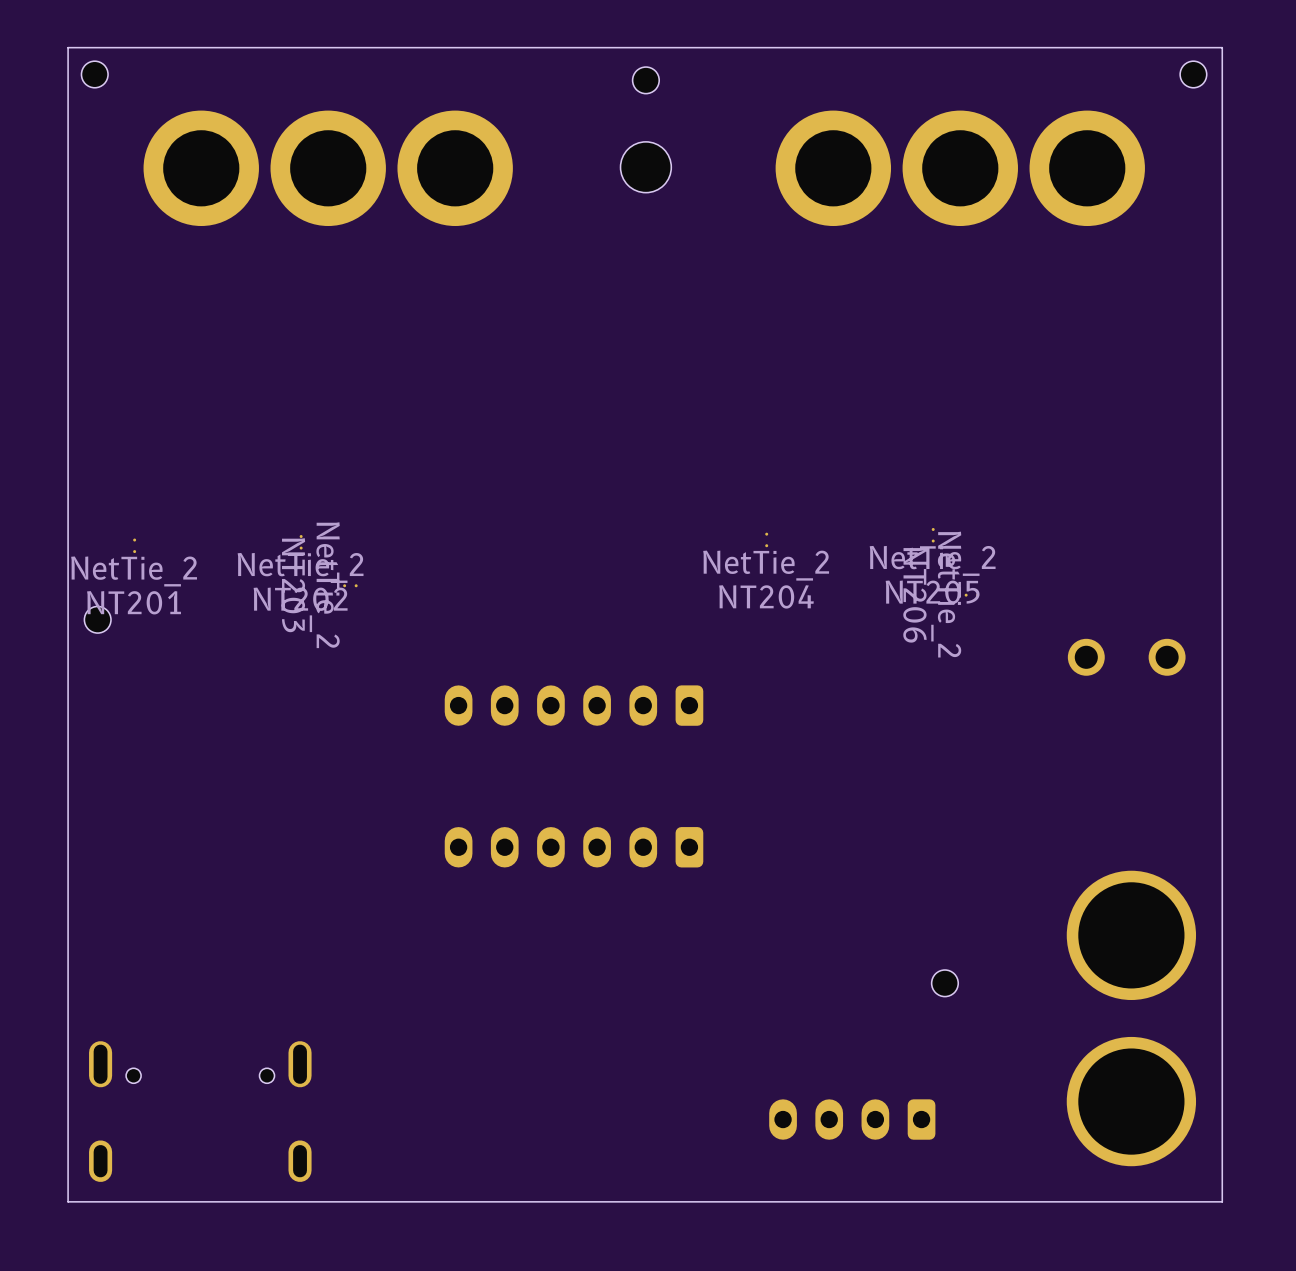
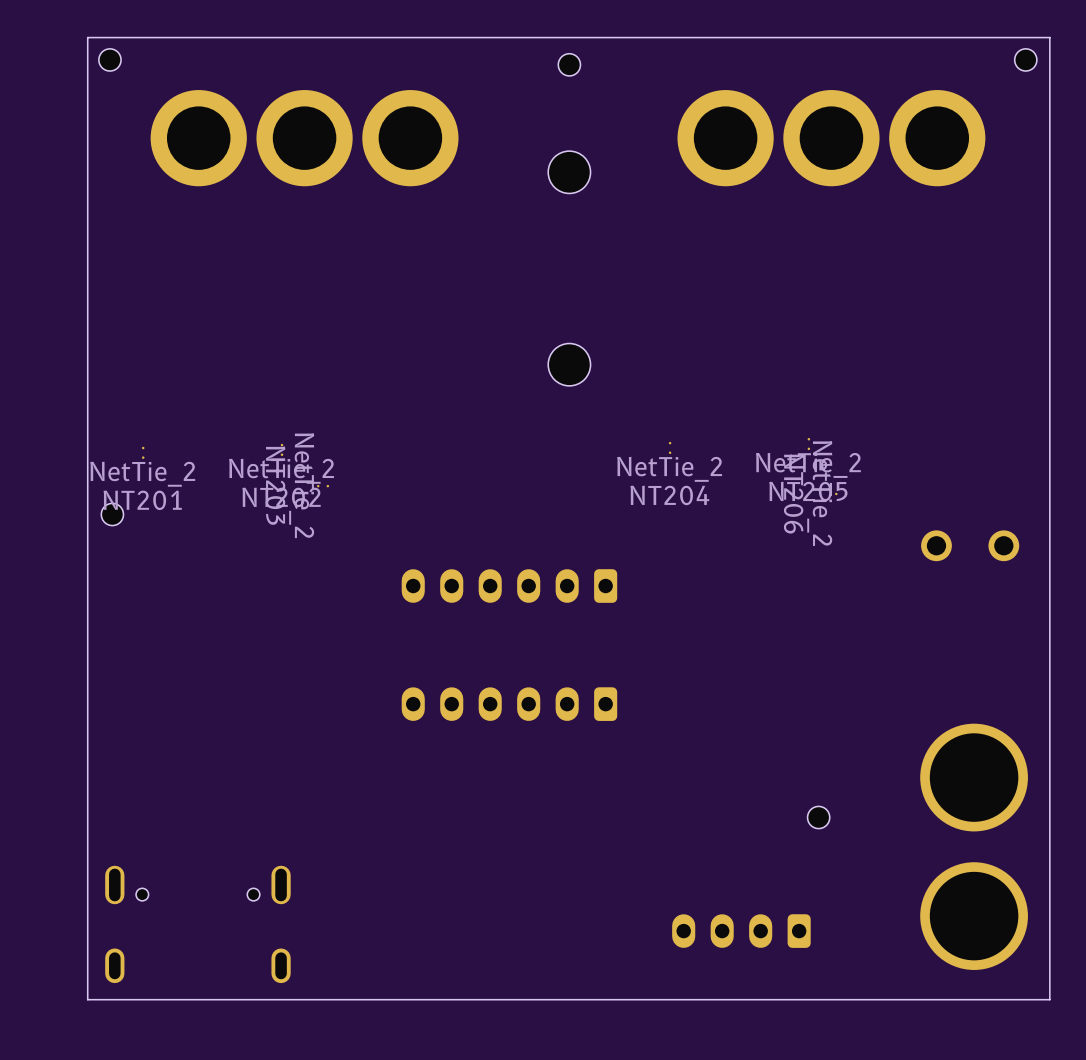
part position: (645, 167) -> (569, 172)
part: none -> (569, 364)

